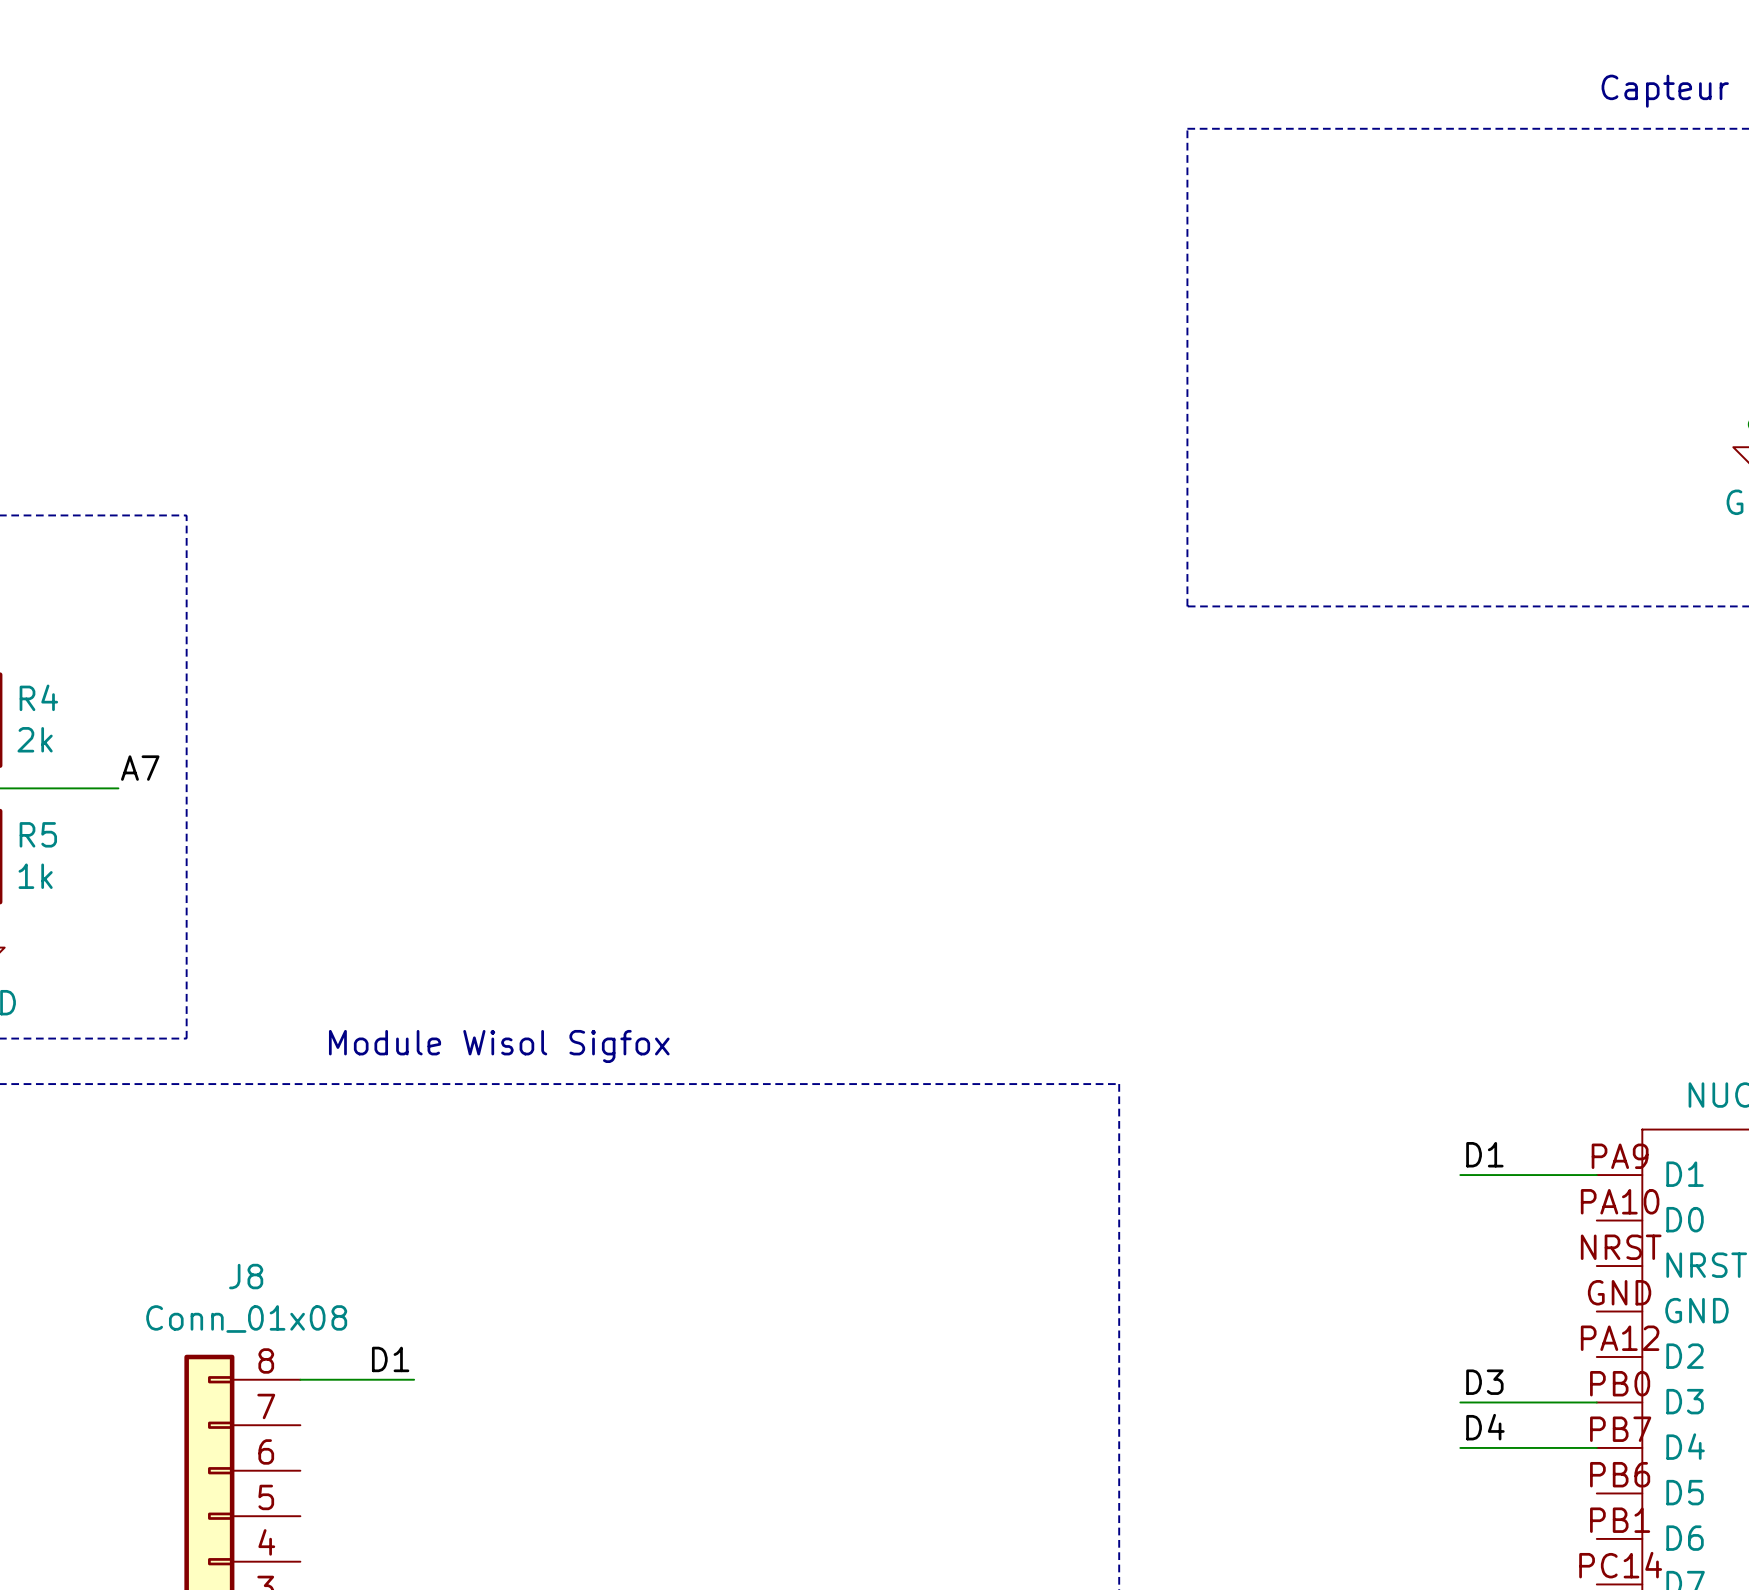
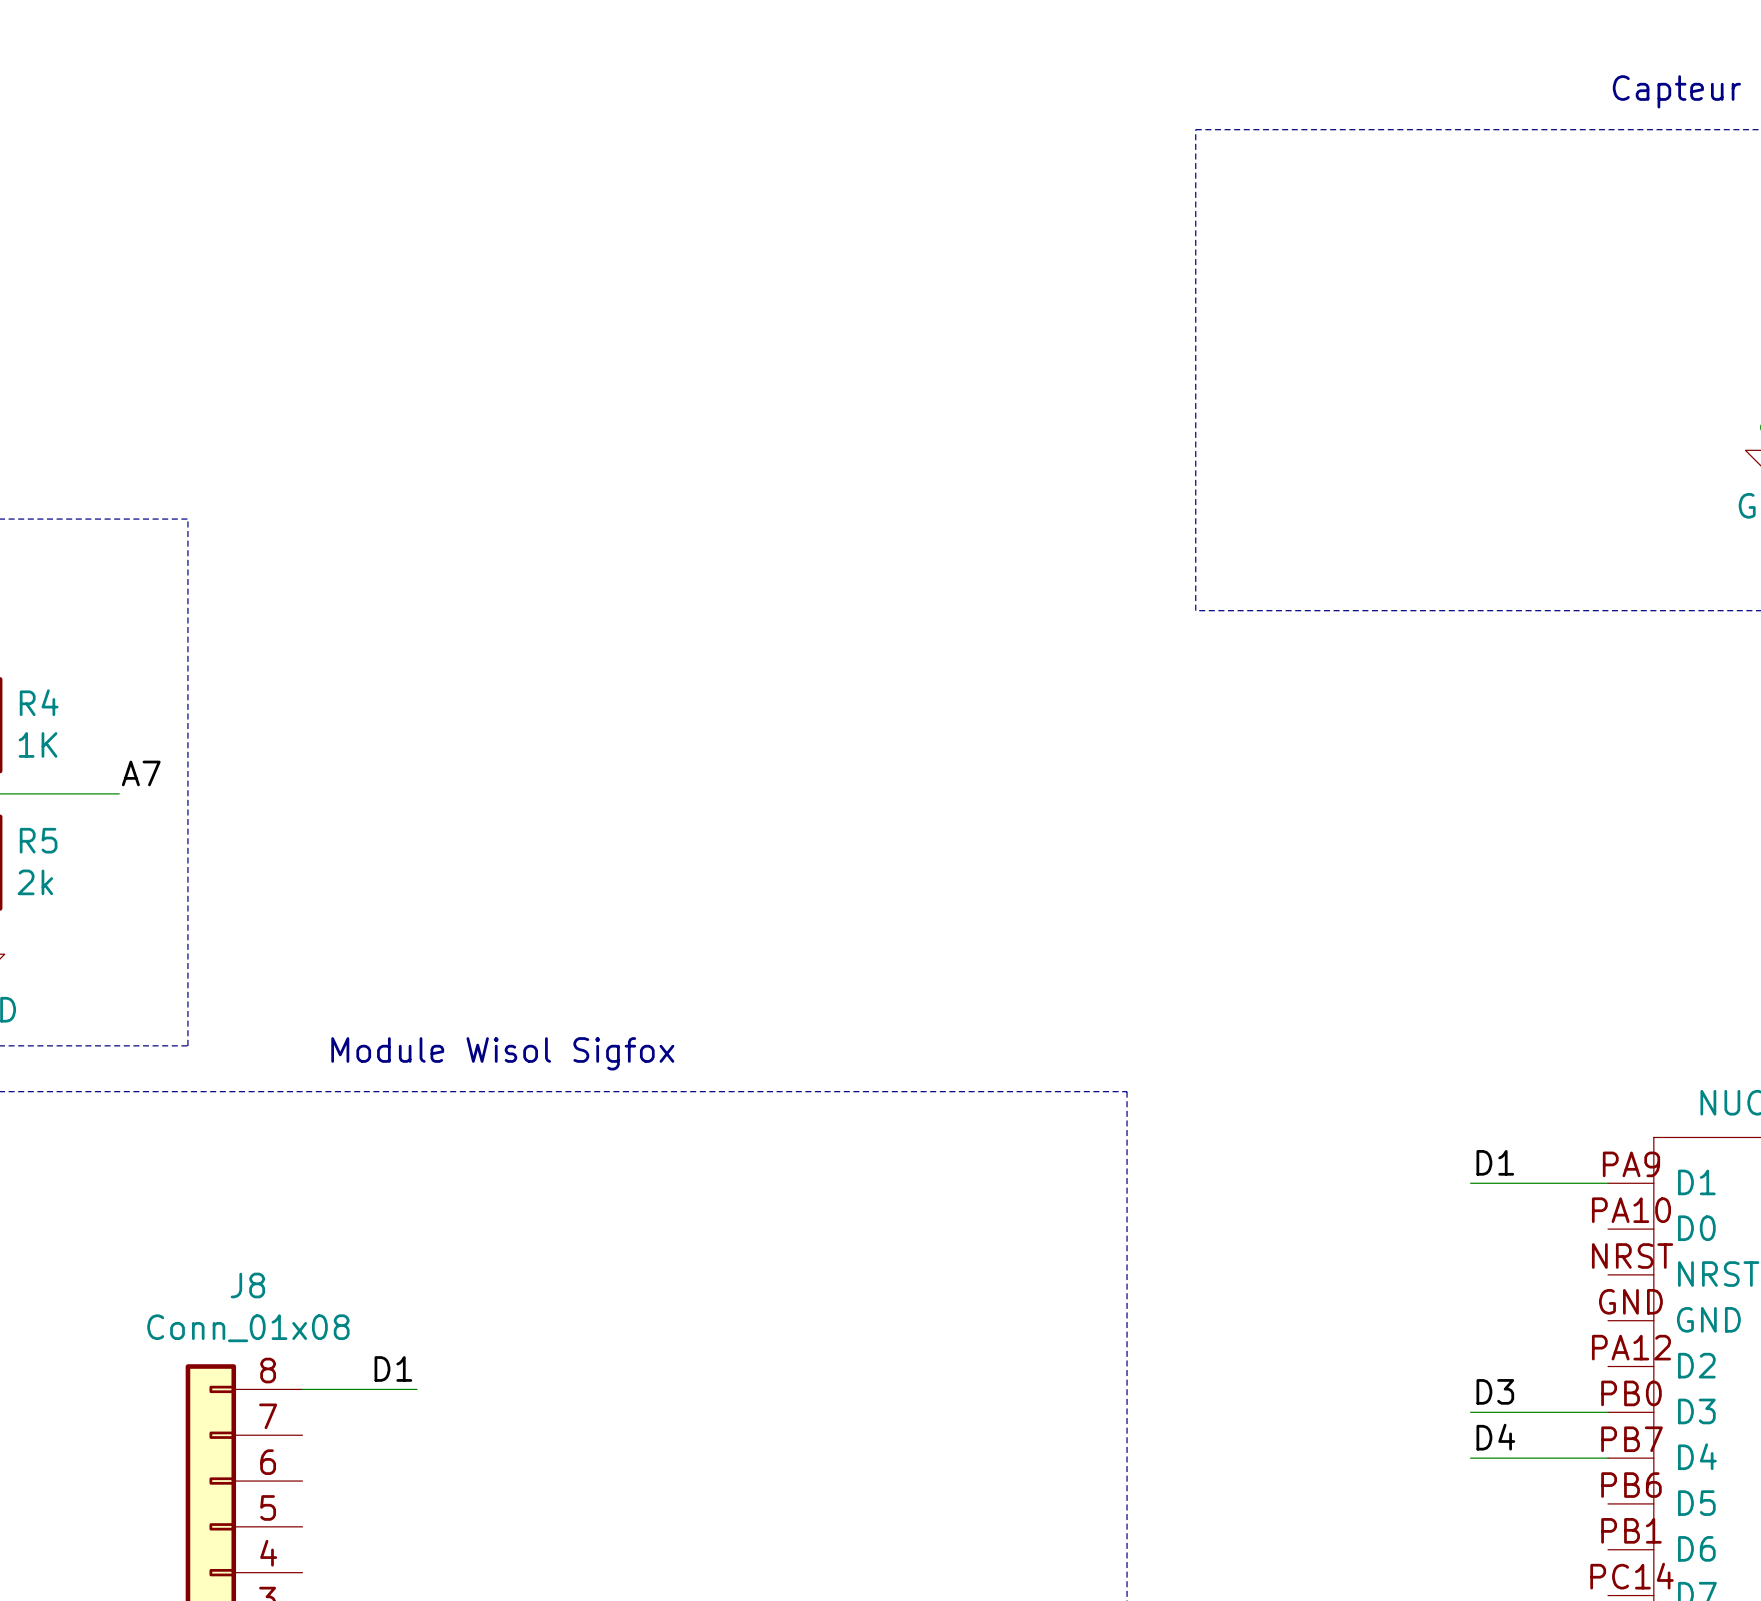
R4 value: 2k (35, 739) -> 1K (38, 744)
R5 value: 1k (35, 876) -> 2k (35, 882)

